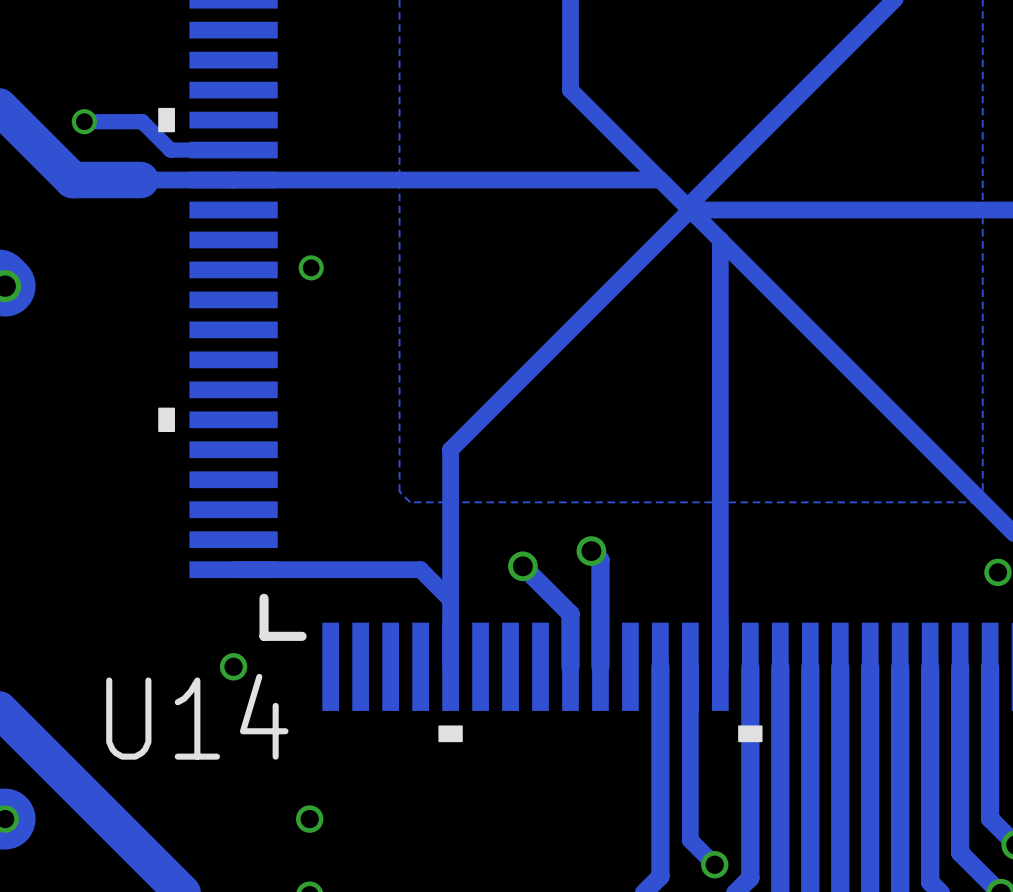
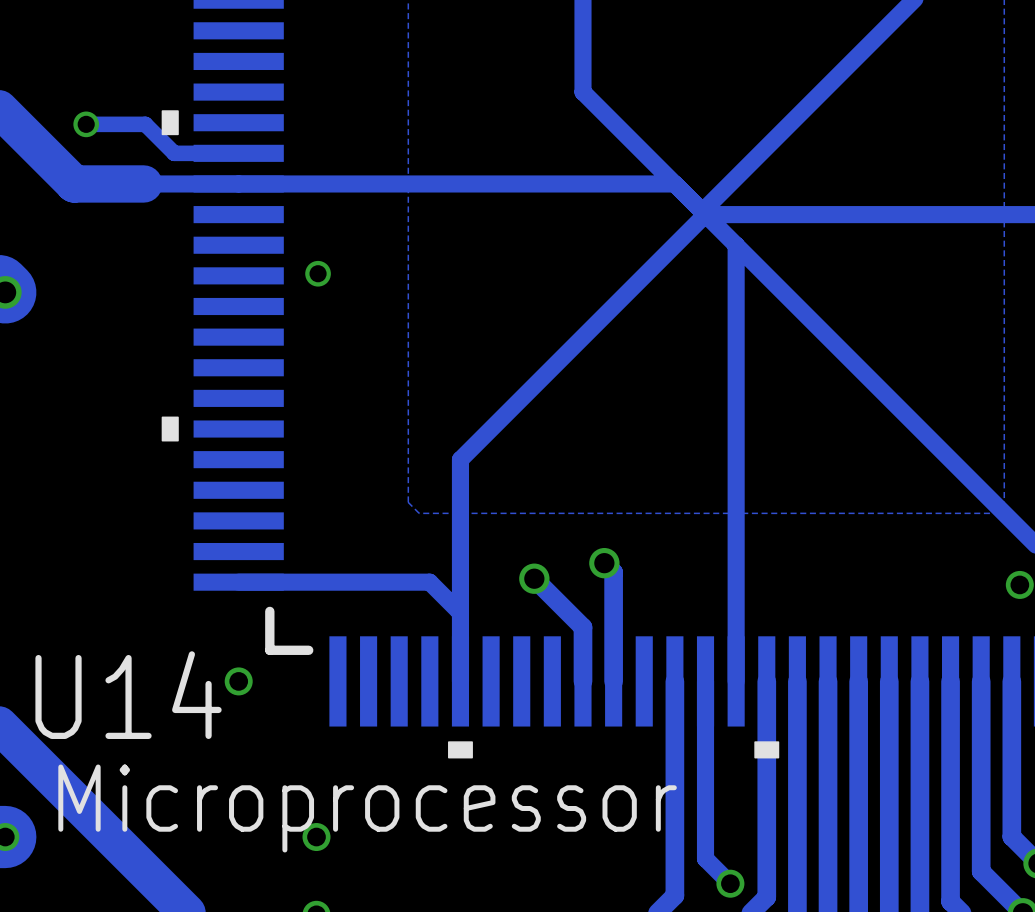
U14 name position: U14 (197, 716) -> U14 (128, 695)
text: none -> Microprocessor (367, 808)

